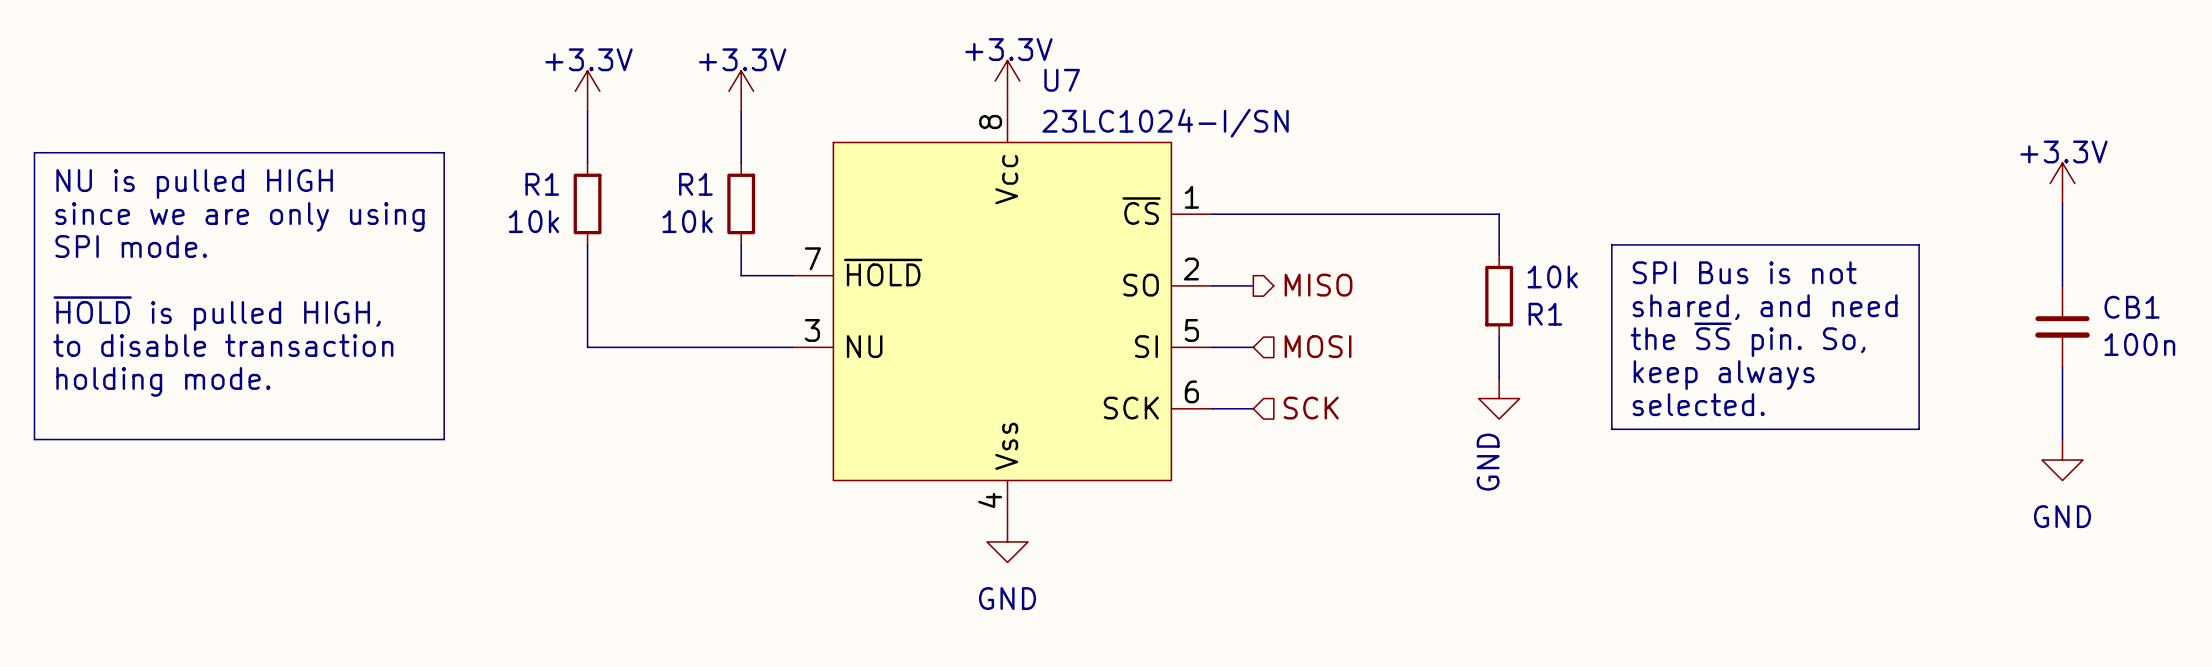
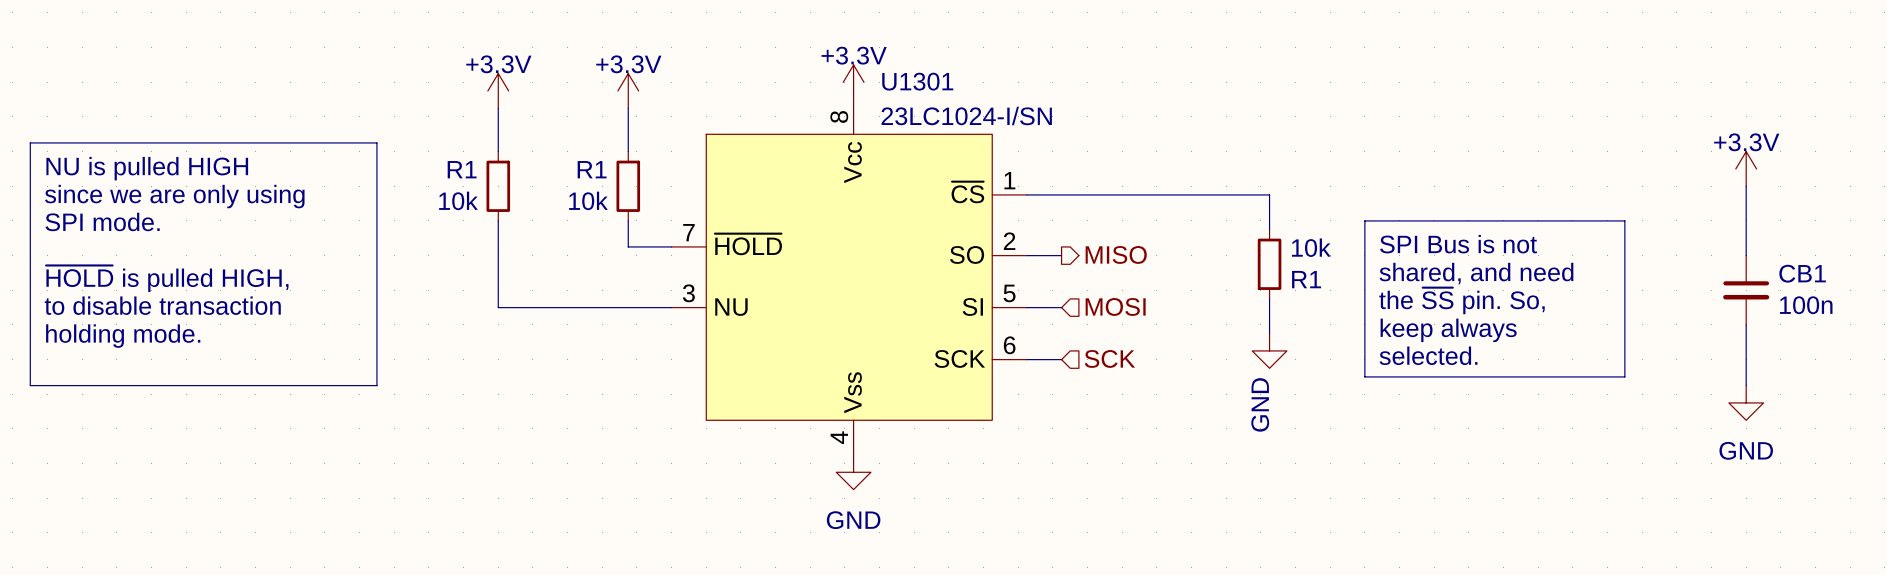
U7 name: U7 (1062, 80) -> U1301 (917, 81)

